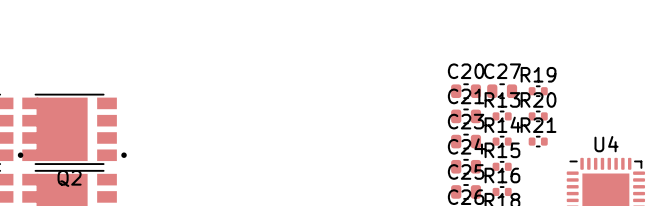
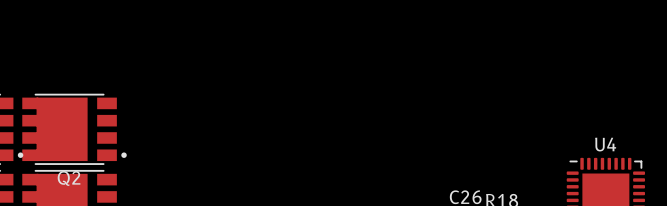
C20: (466, 91) -> none
C27: (502, 91) -> none
R19: (538, 91) -> none
C21: (466, 116) -> none
R13: (502, 116) -> none
R20: (538, 116) -> none
C23: (466, 141) -> none
R14: (502, 141) -> none
R21: (538, 141) -> none
C24: (466, 166) -> none
R15: (502, 166) -> none
C25: (466, 191) -> none
R16: (502, 191) -> none

